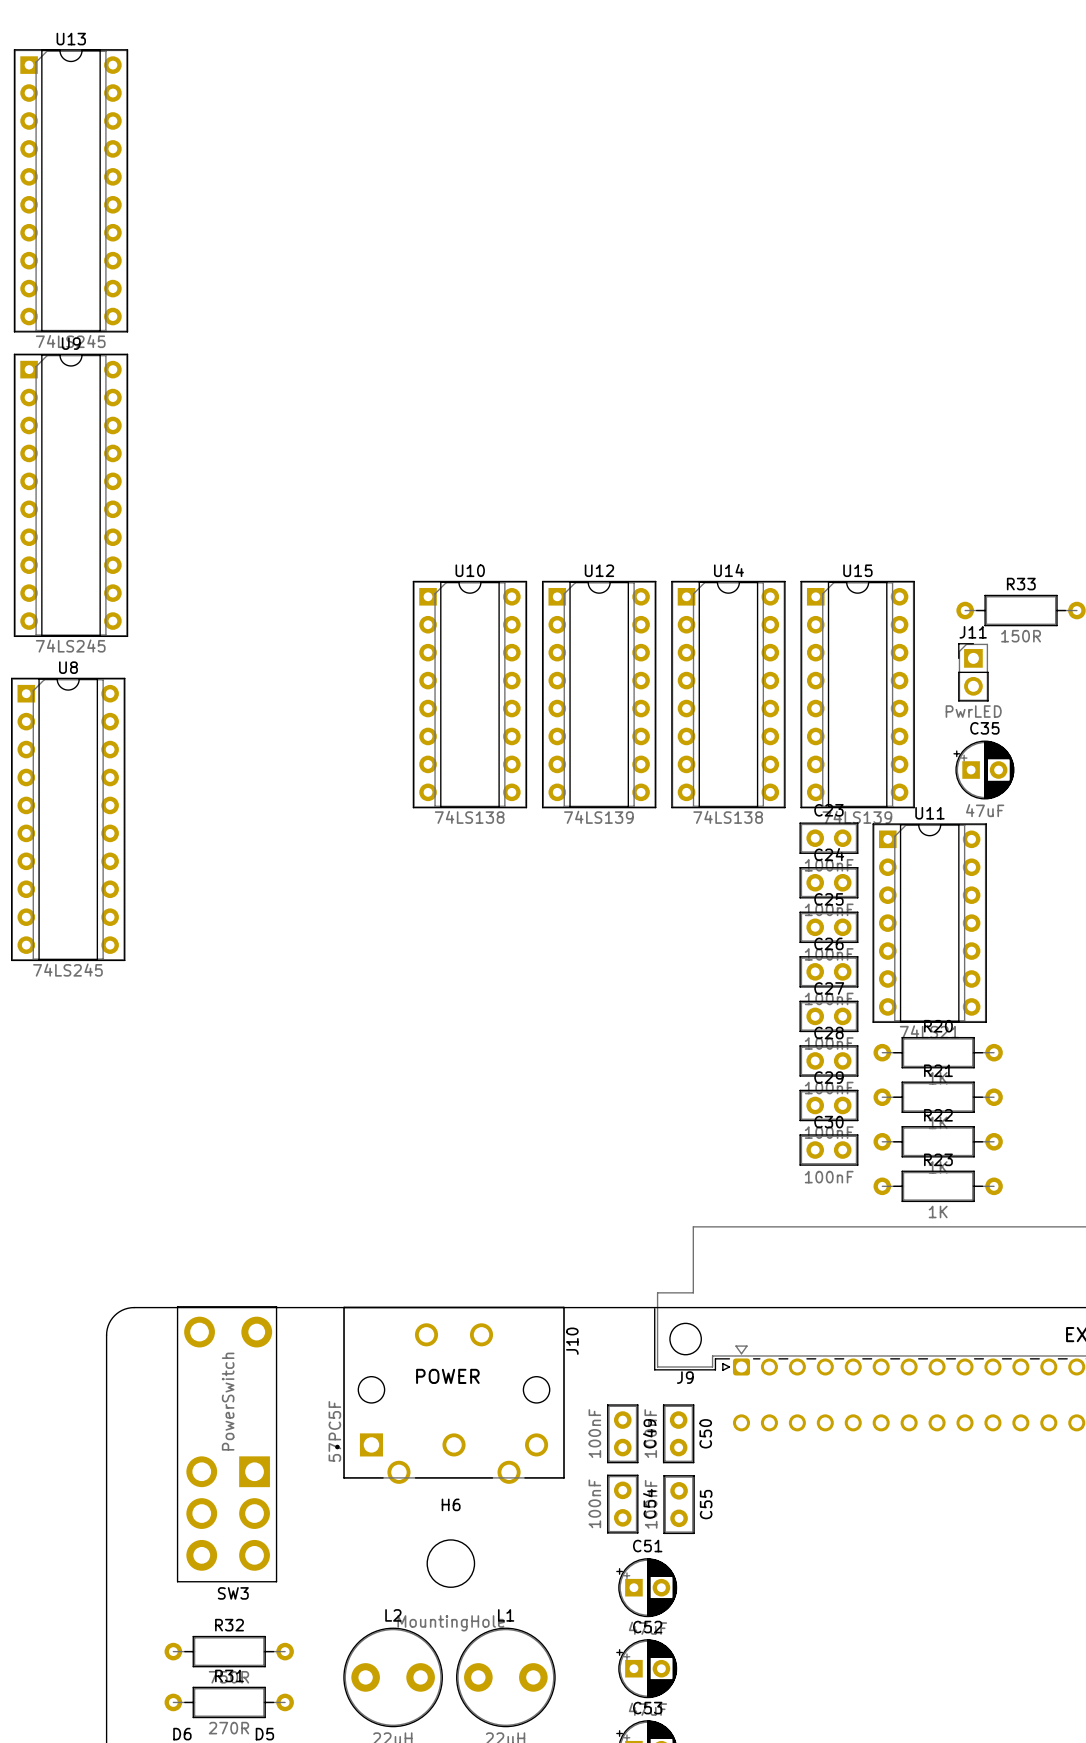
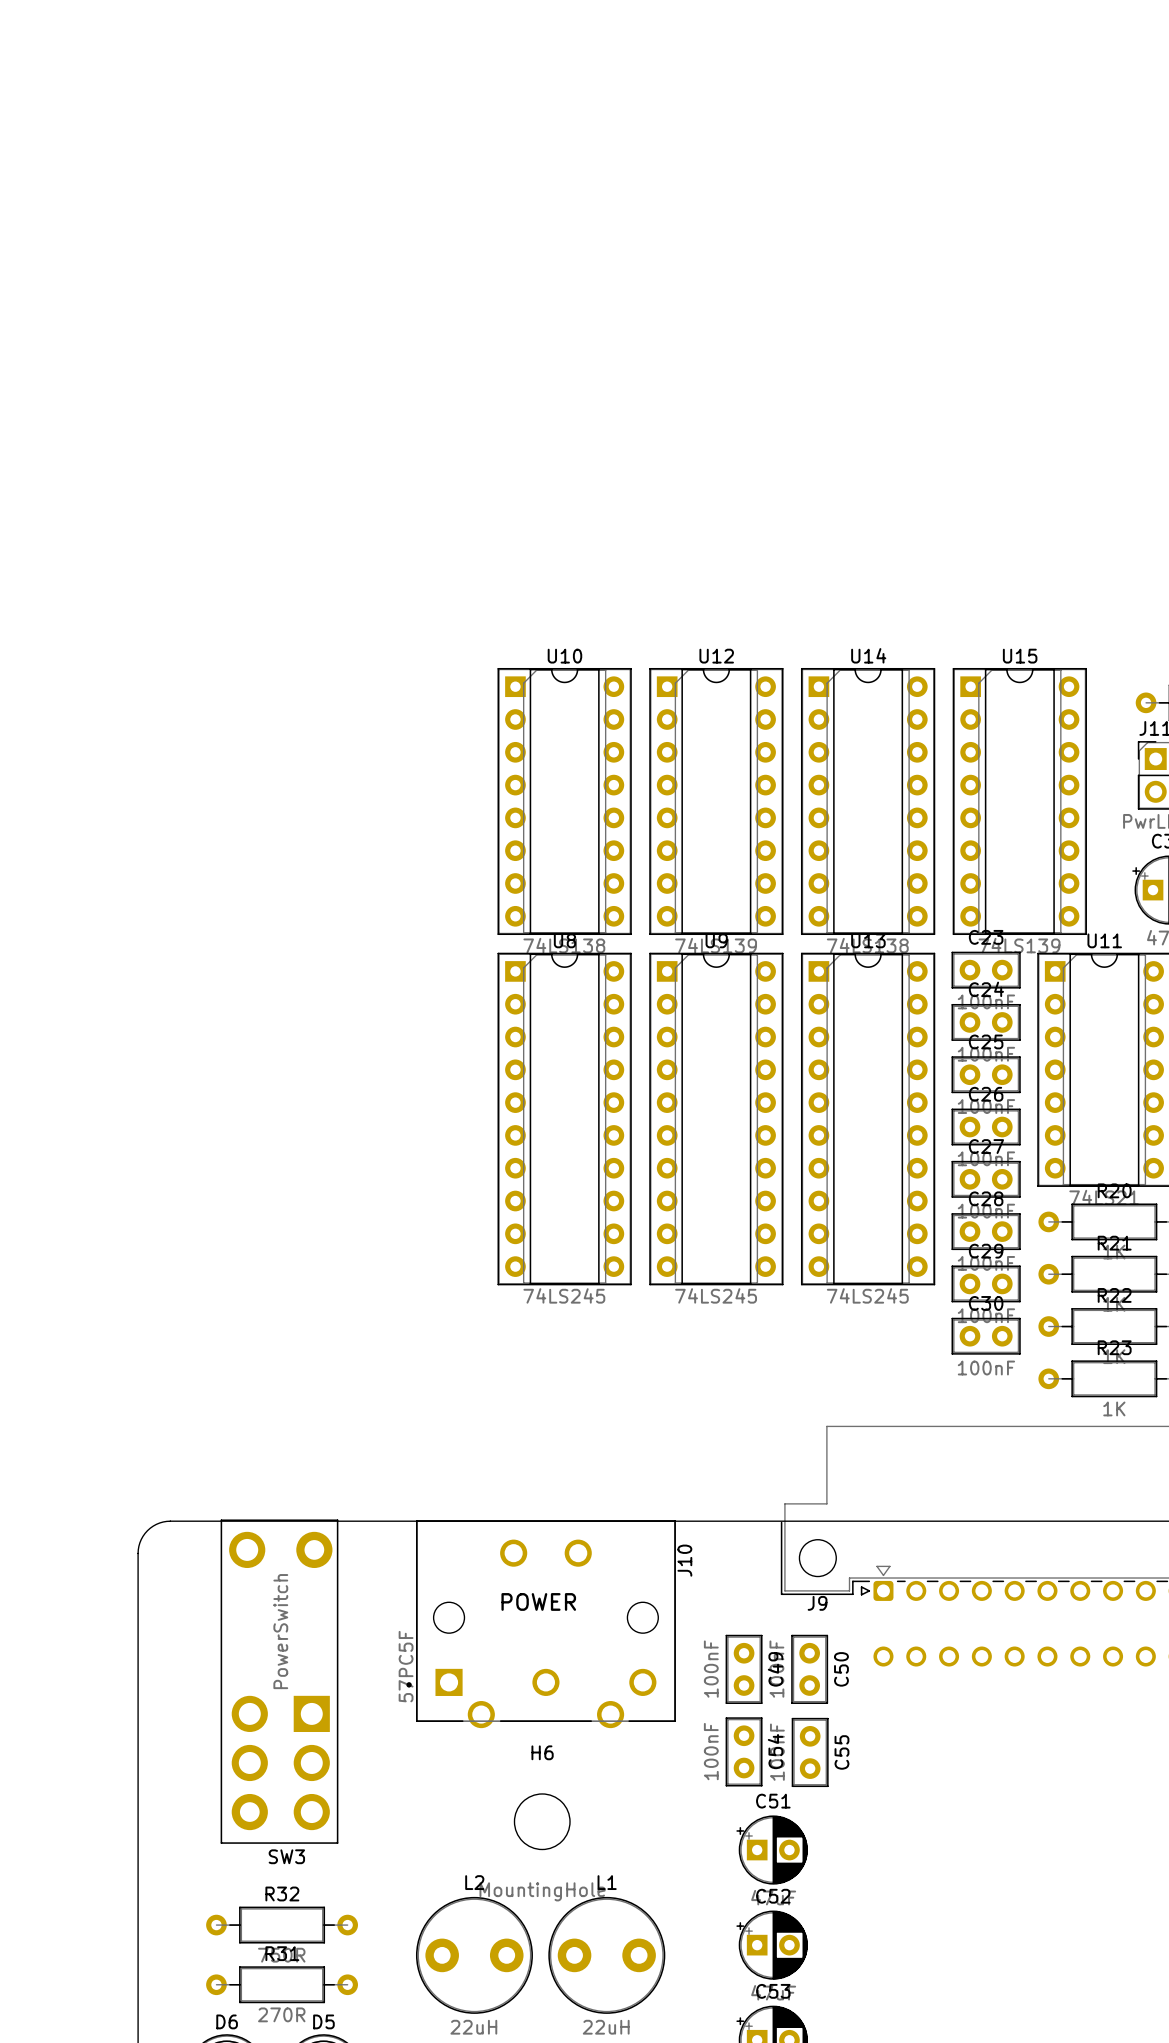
U13 position: (71, 190) -> (868, 1119)
U9 position: (71, 495) -> (716, 1119)
U8 position: (68, 819) -> (564, 1119)

